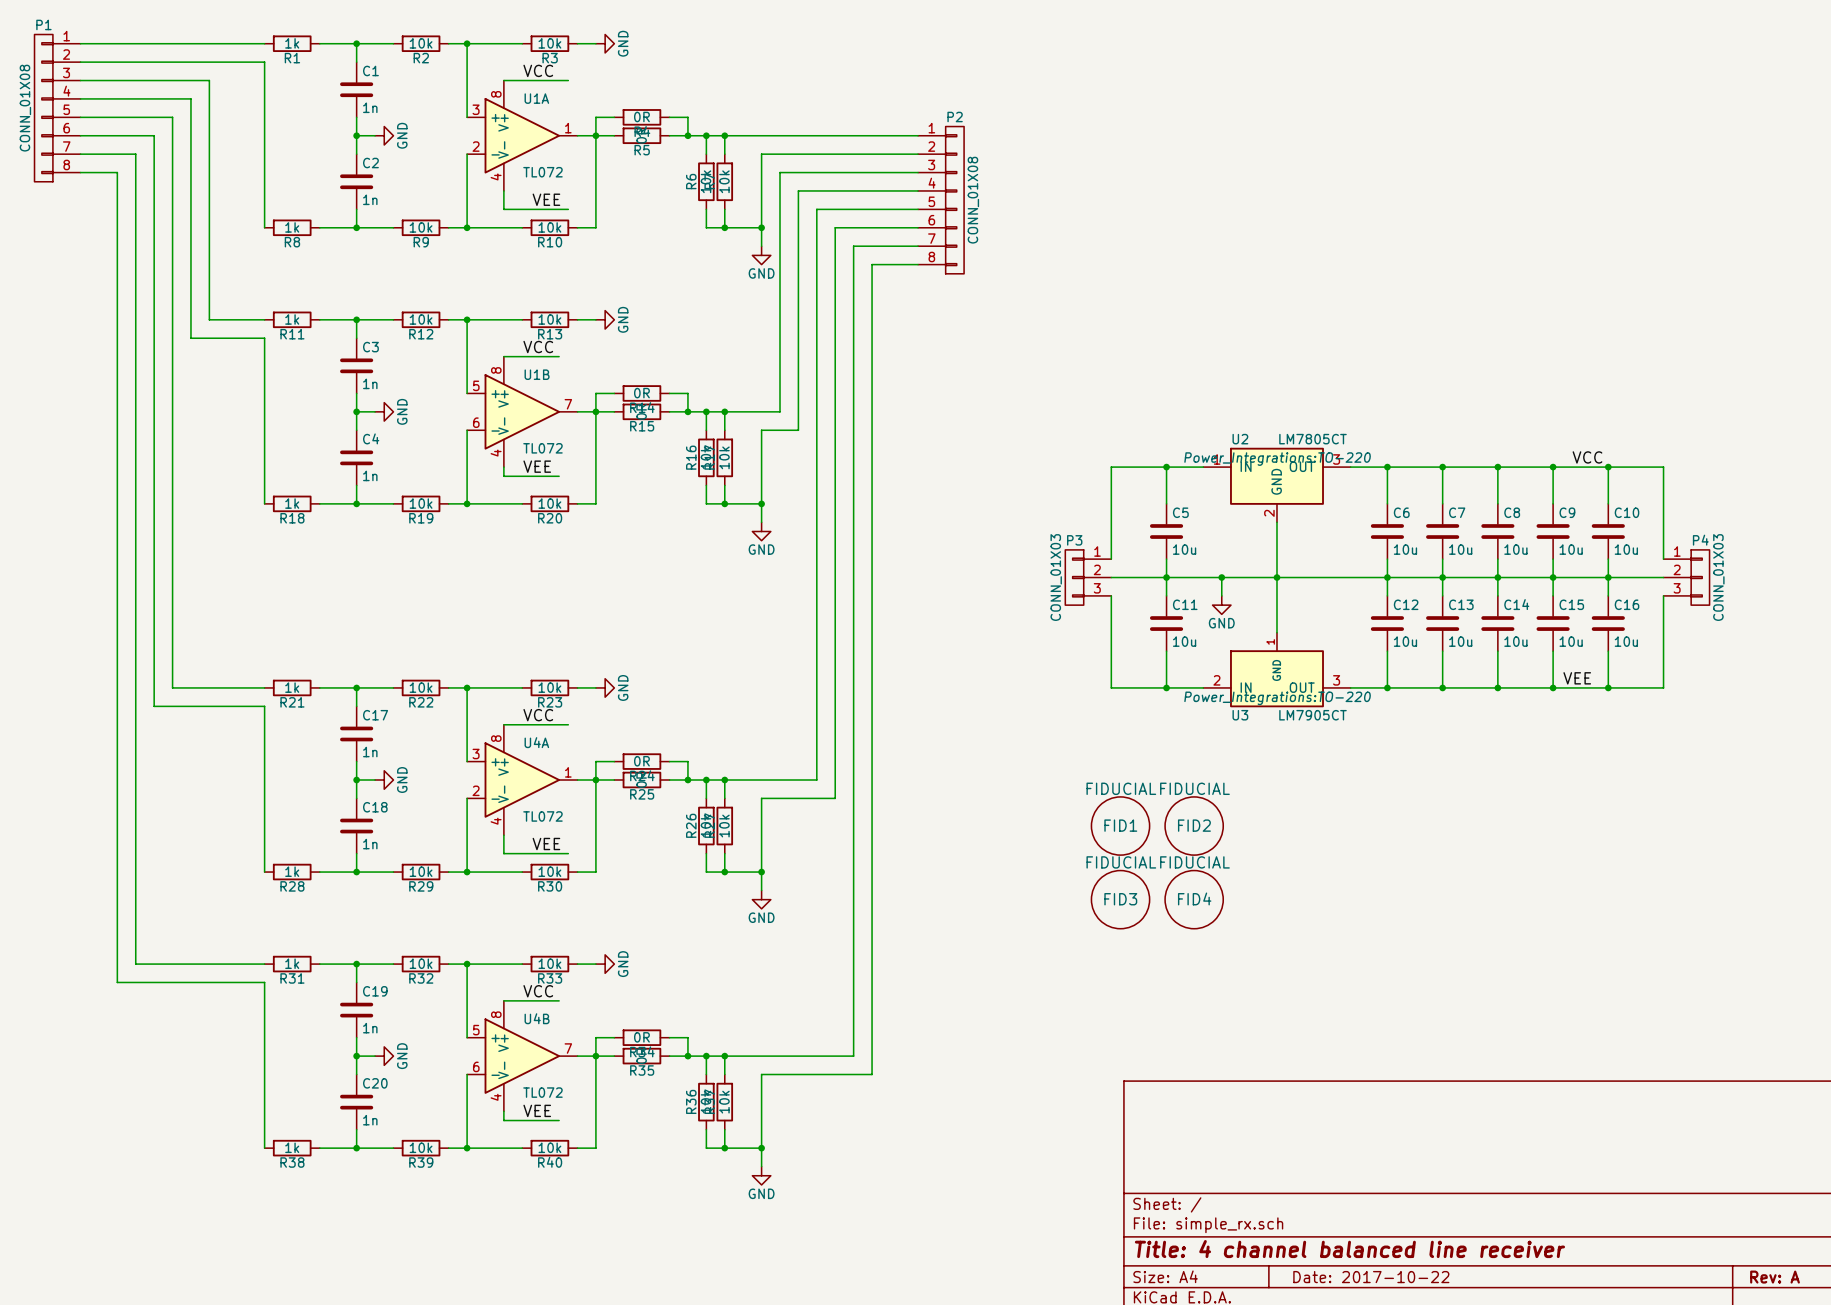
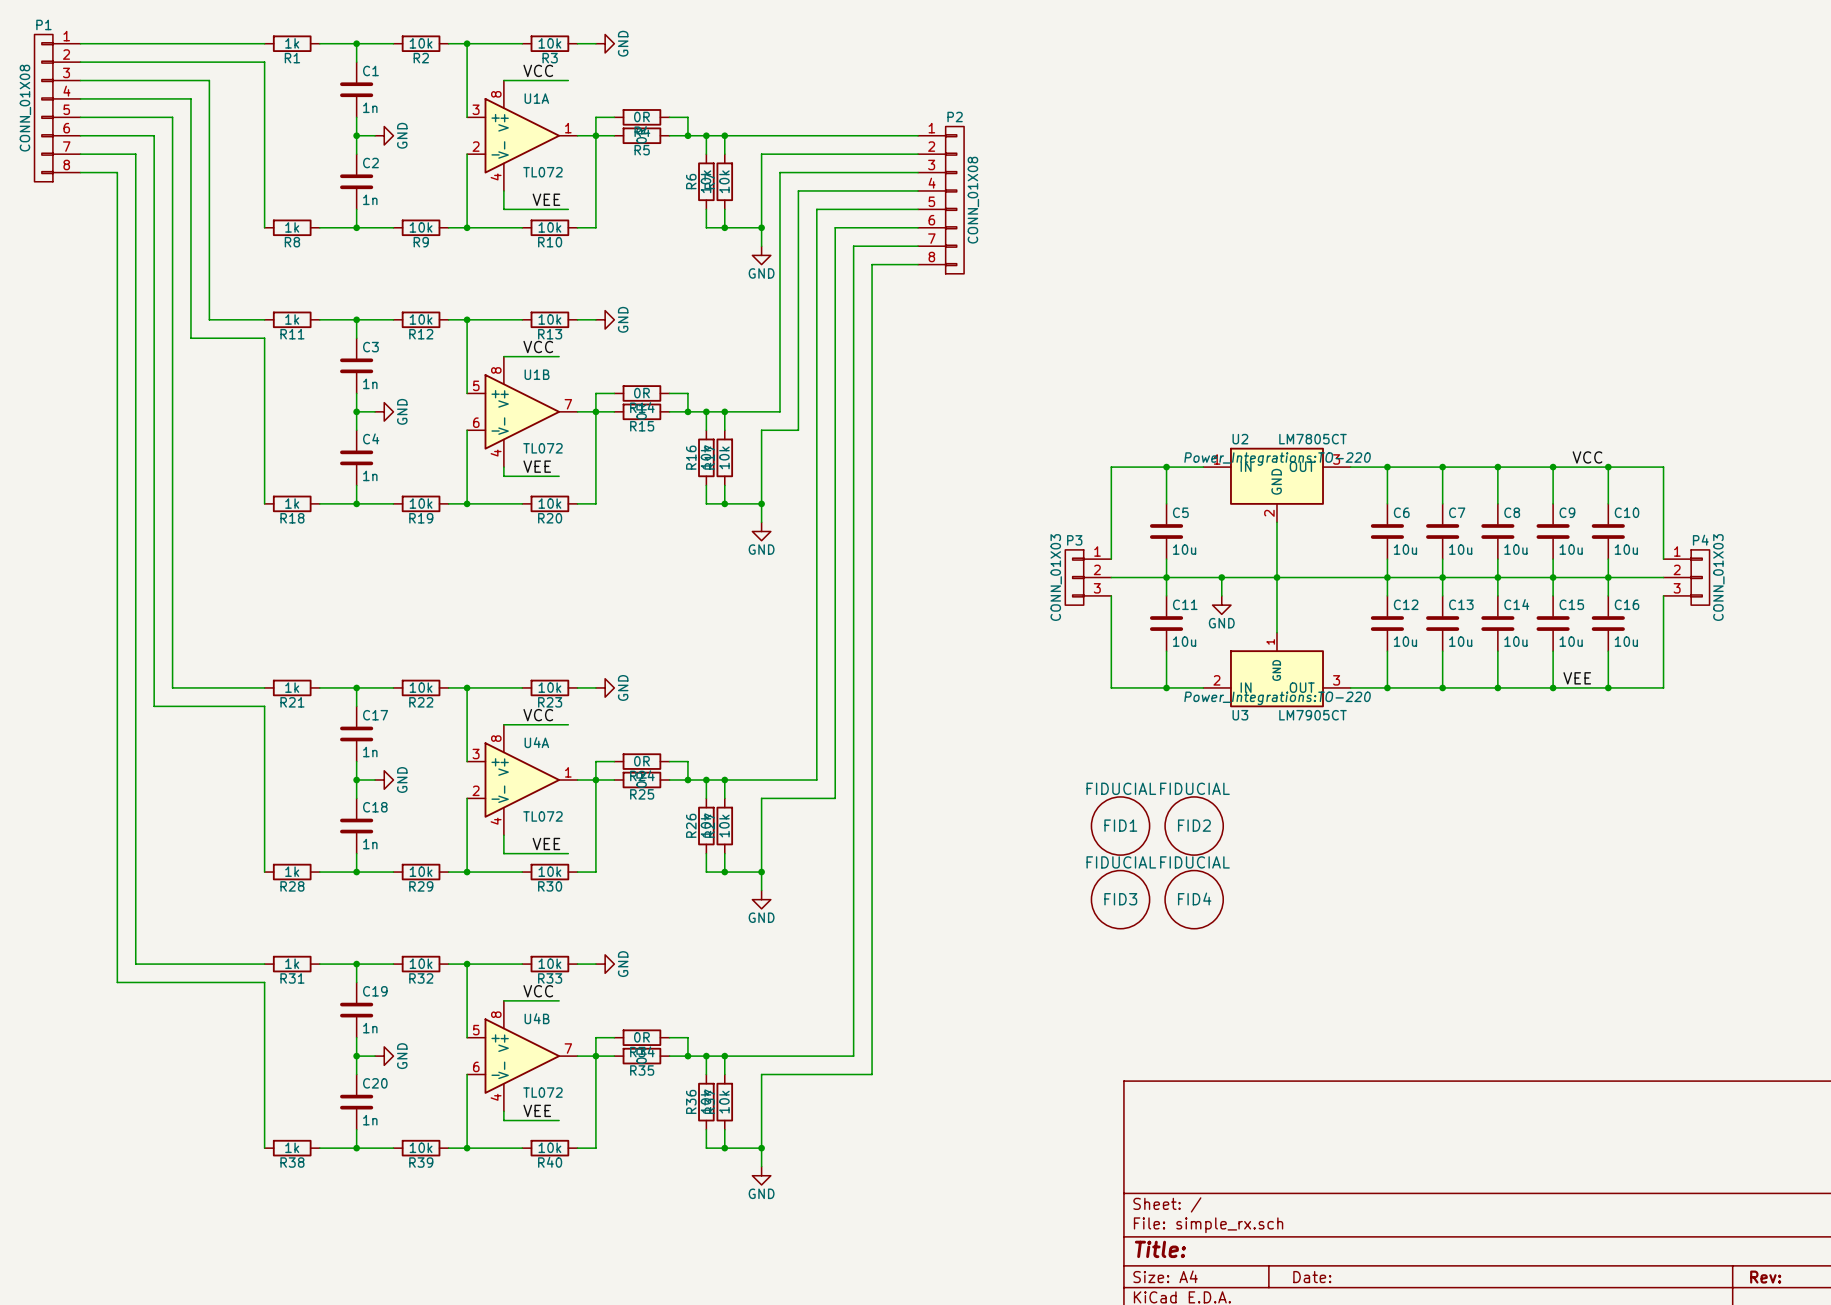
title block: Title: 4 channel balanced line receiver (1349, 1249) -> Title: (1160, 1249)
title block: Date: 2017-10-22 (1371, 1277) -> Date: (1312, 1277)
title block: Rev: A (1775, 1277) -> Rev: (1765, 1277)

